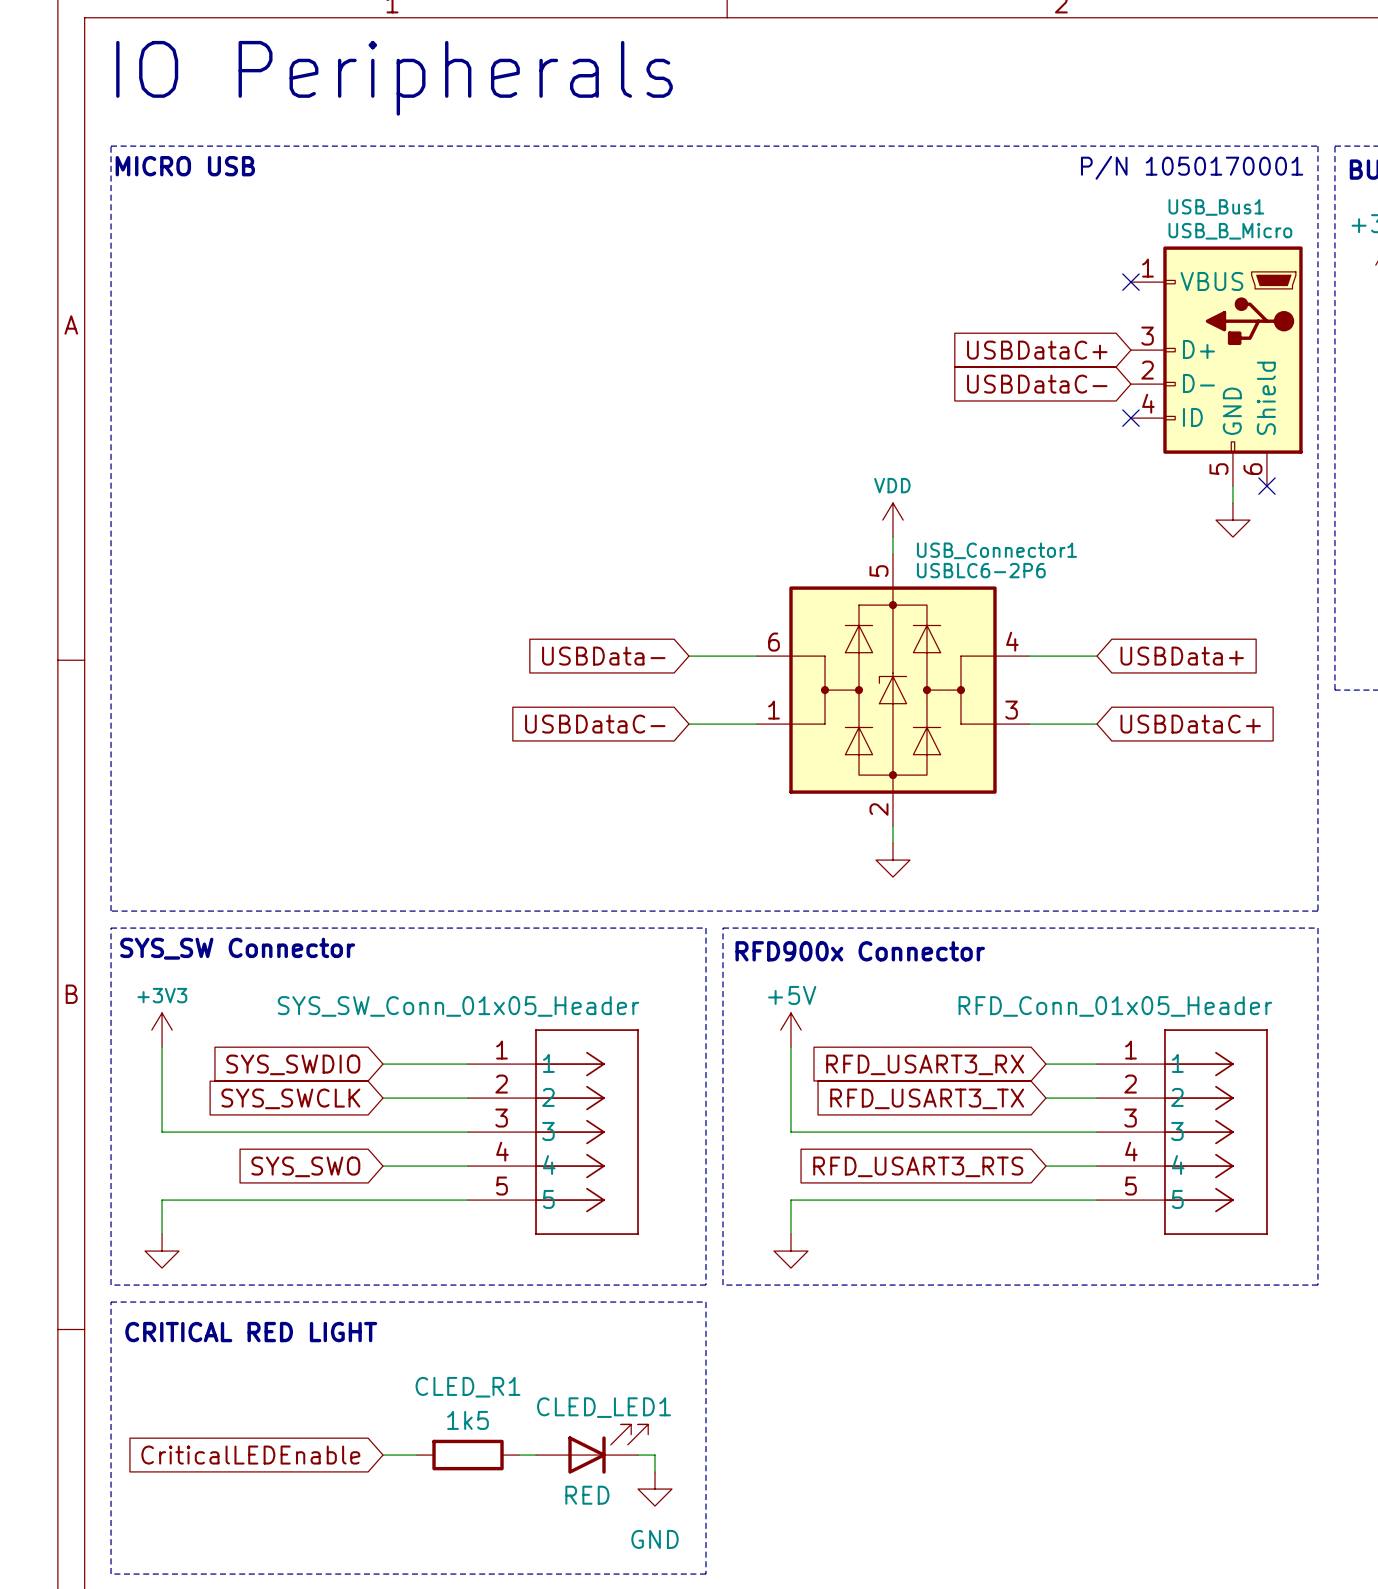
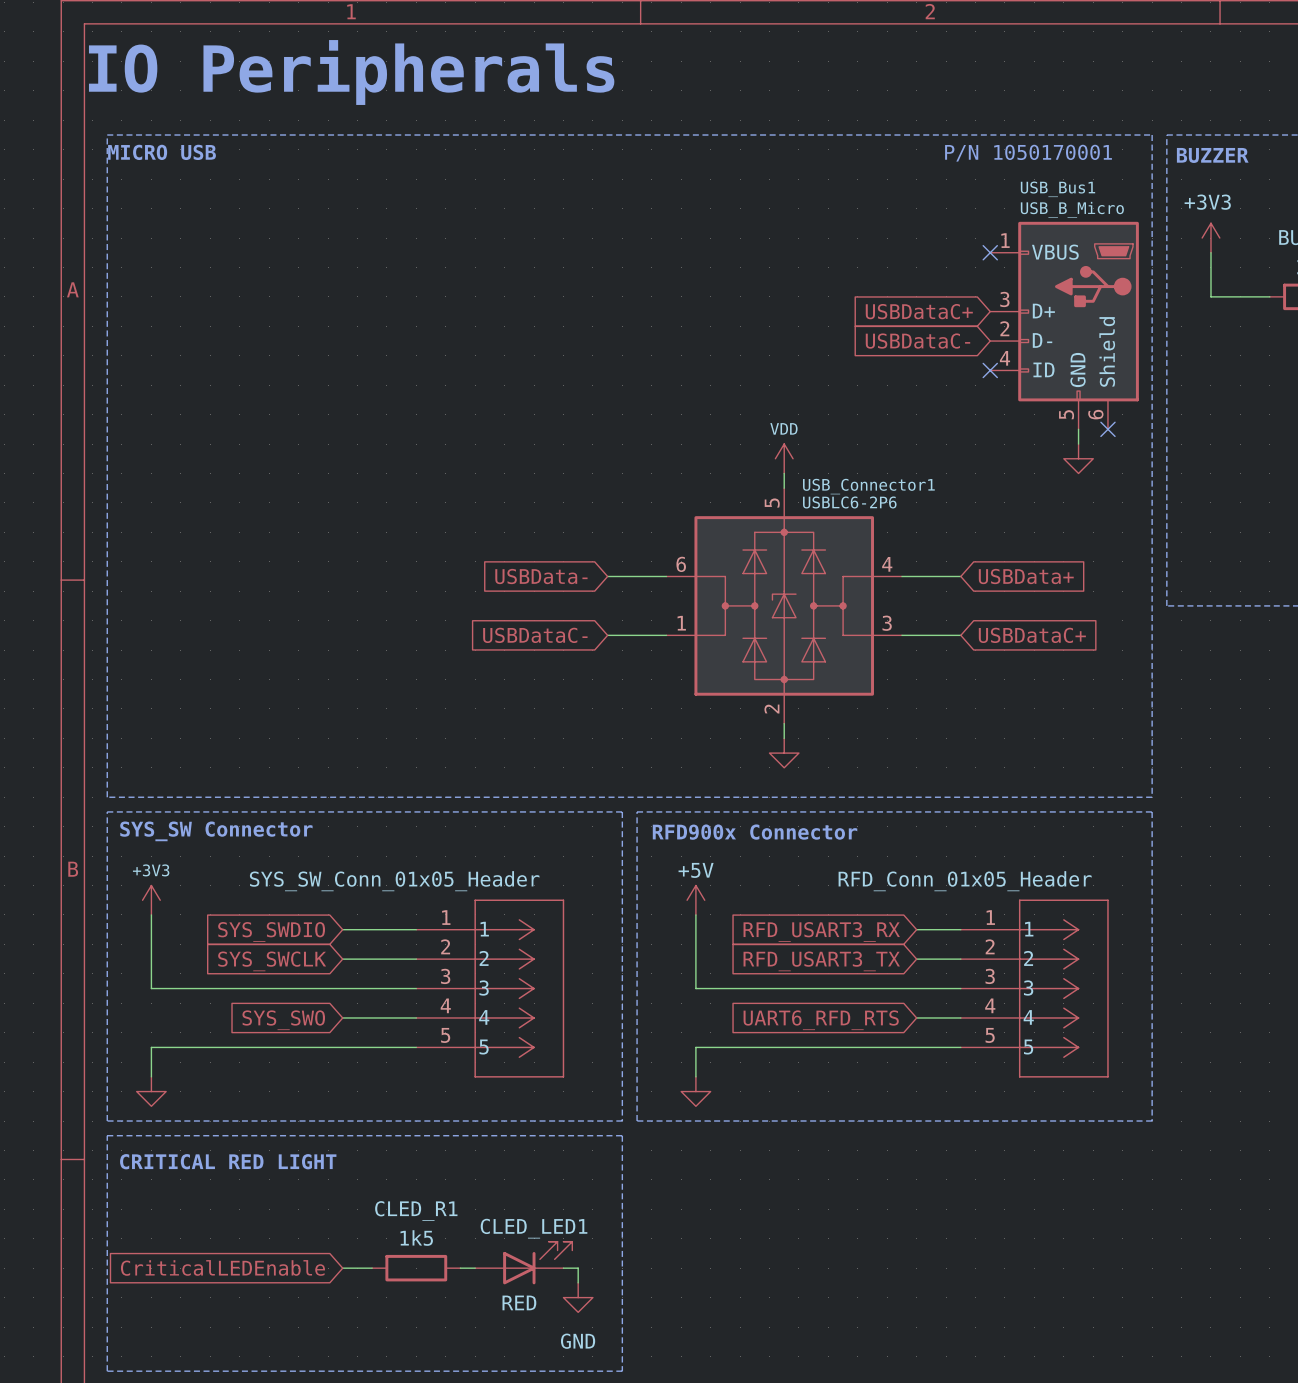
global label: RFD_USART3_RTS (918, 1166) -> UART6_RFD_RTS (821, 1020)

